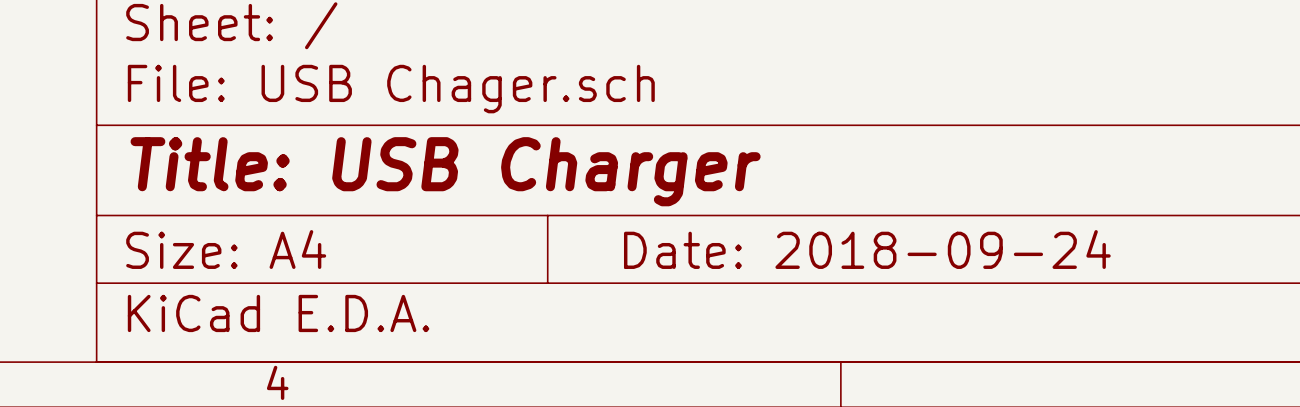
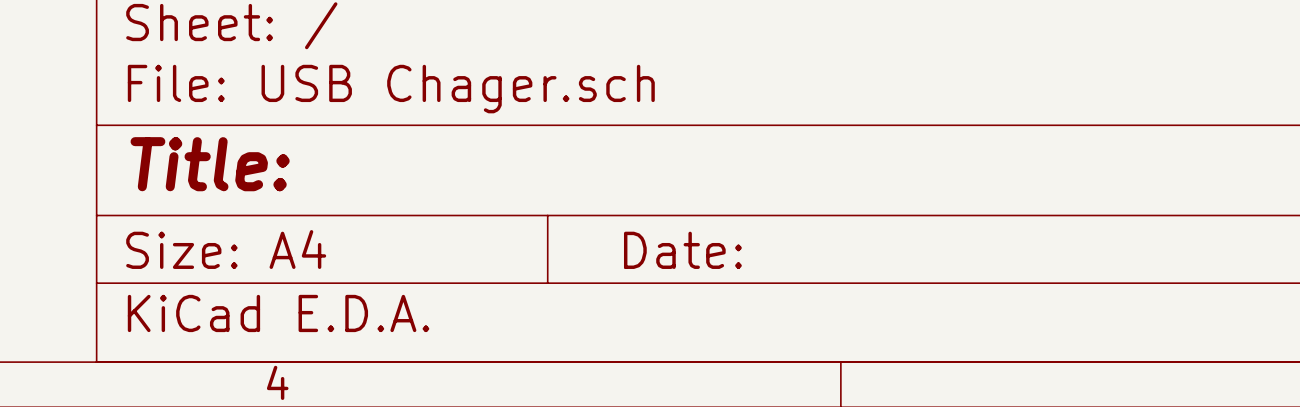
title block: Title: USB Charger (445, 171) -> Title: (210, 164)
title block: Date: 2018-09-24 (867, 249) -> Date: (682, 250)

